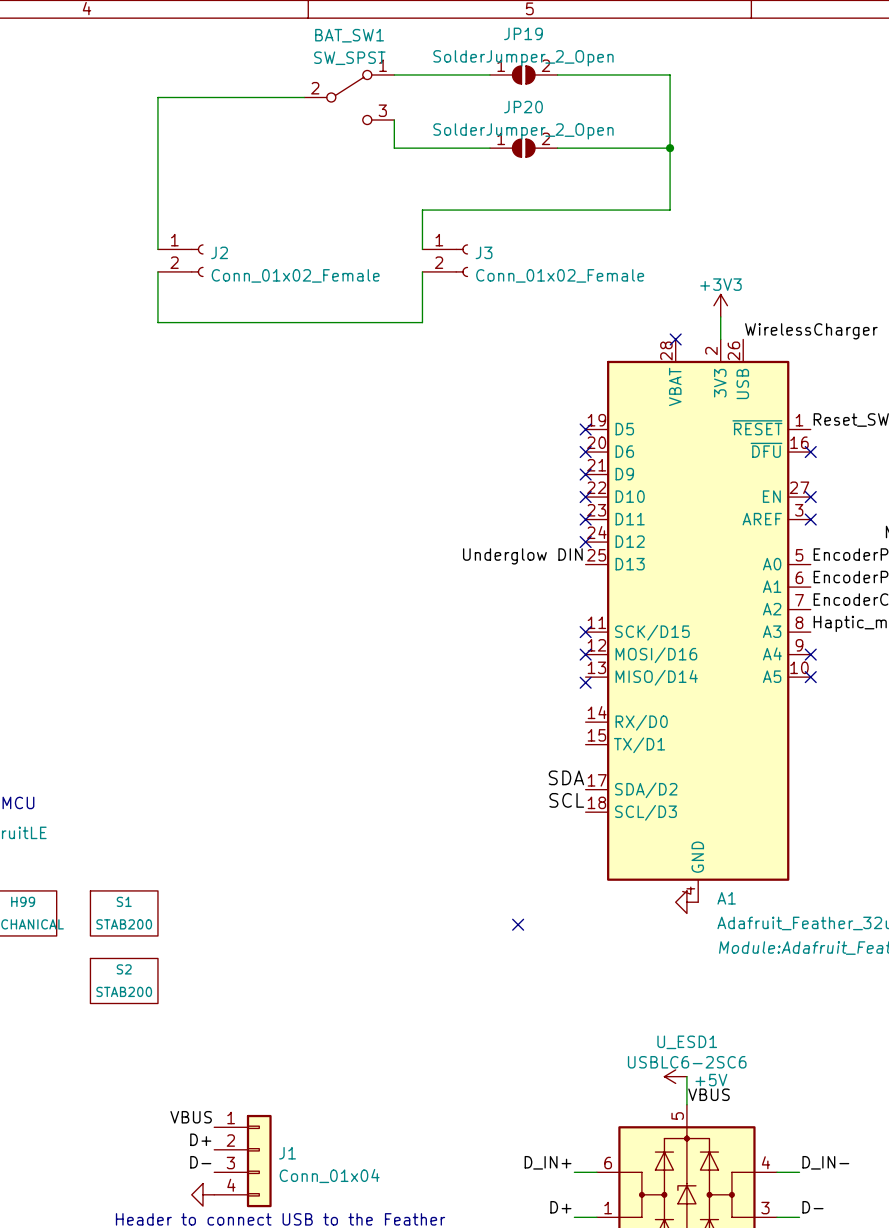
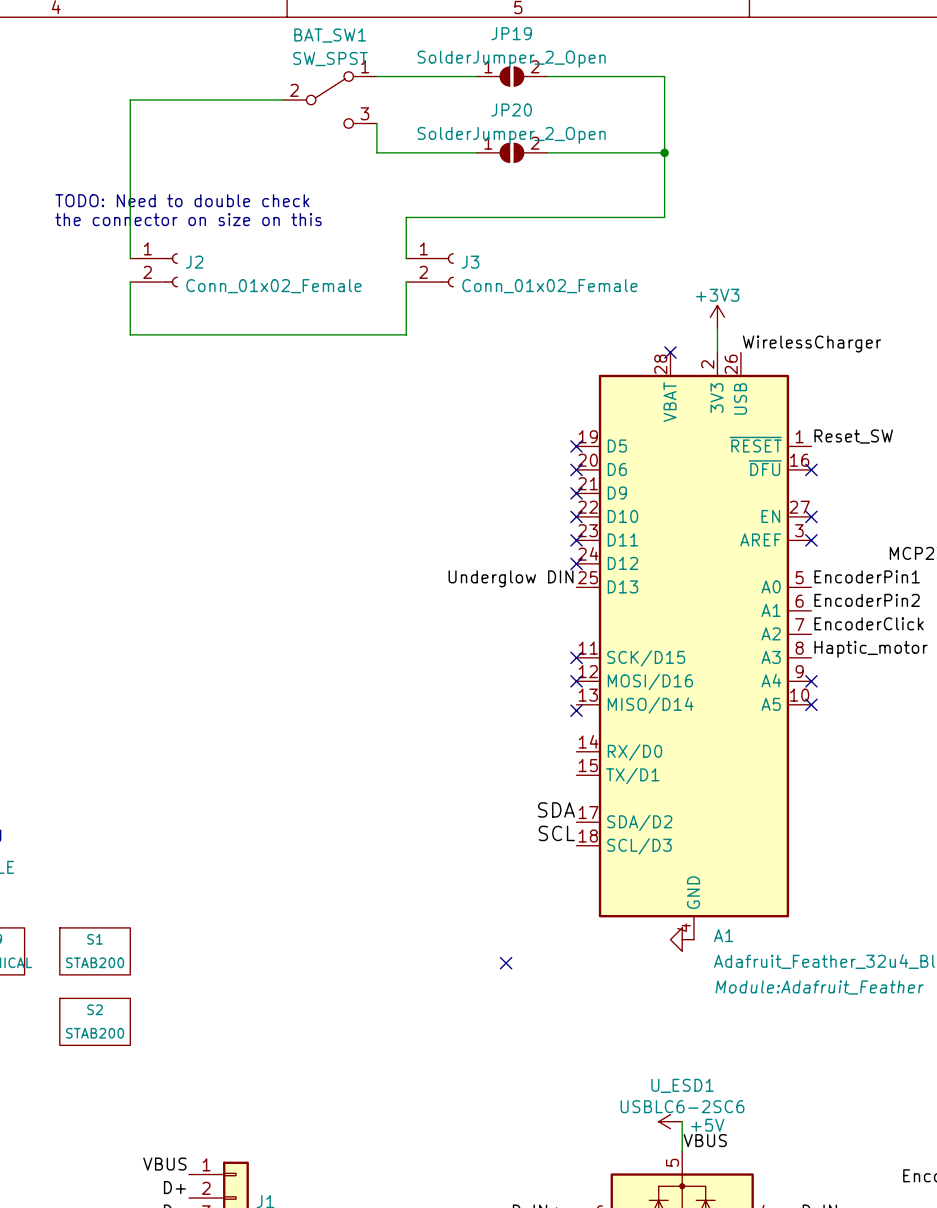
text: none -> TODO: Need to double check (182, 200)
text: none -> the connector on size on this (188, 219)

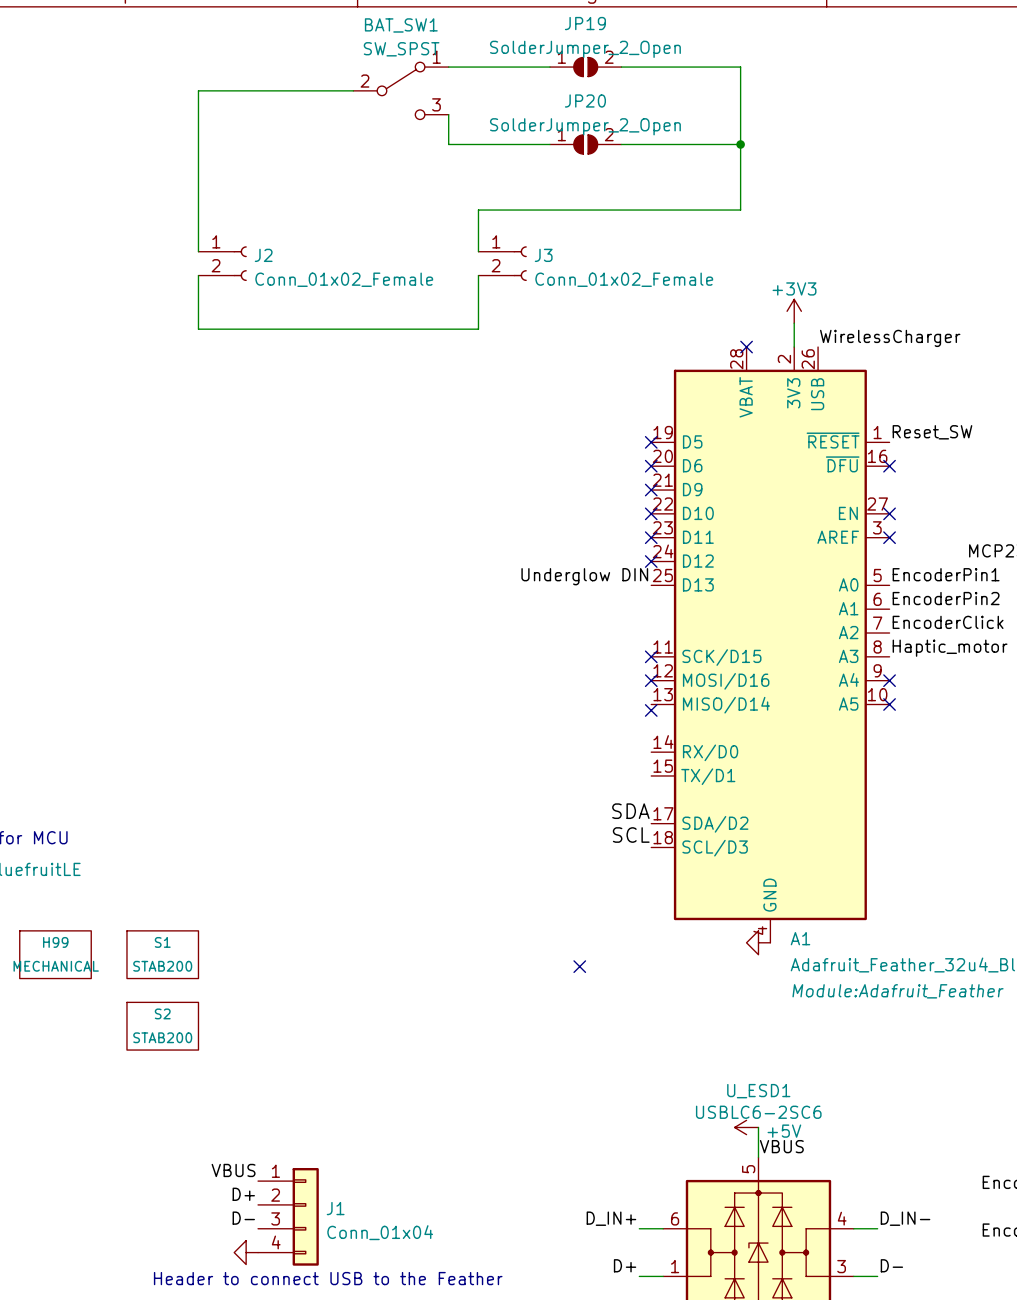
text: TODO: Need to double check (182, 200) -> none
text: the connector on size on this (188, 219) -> none

